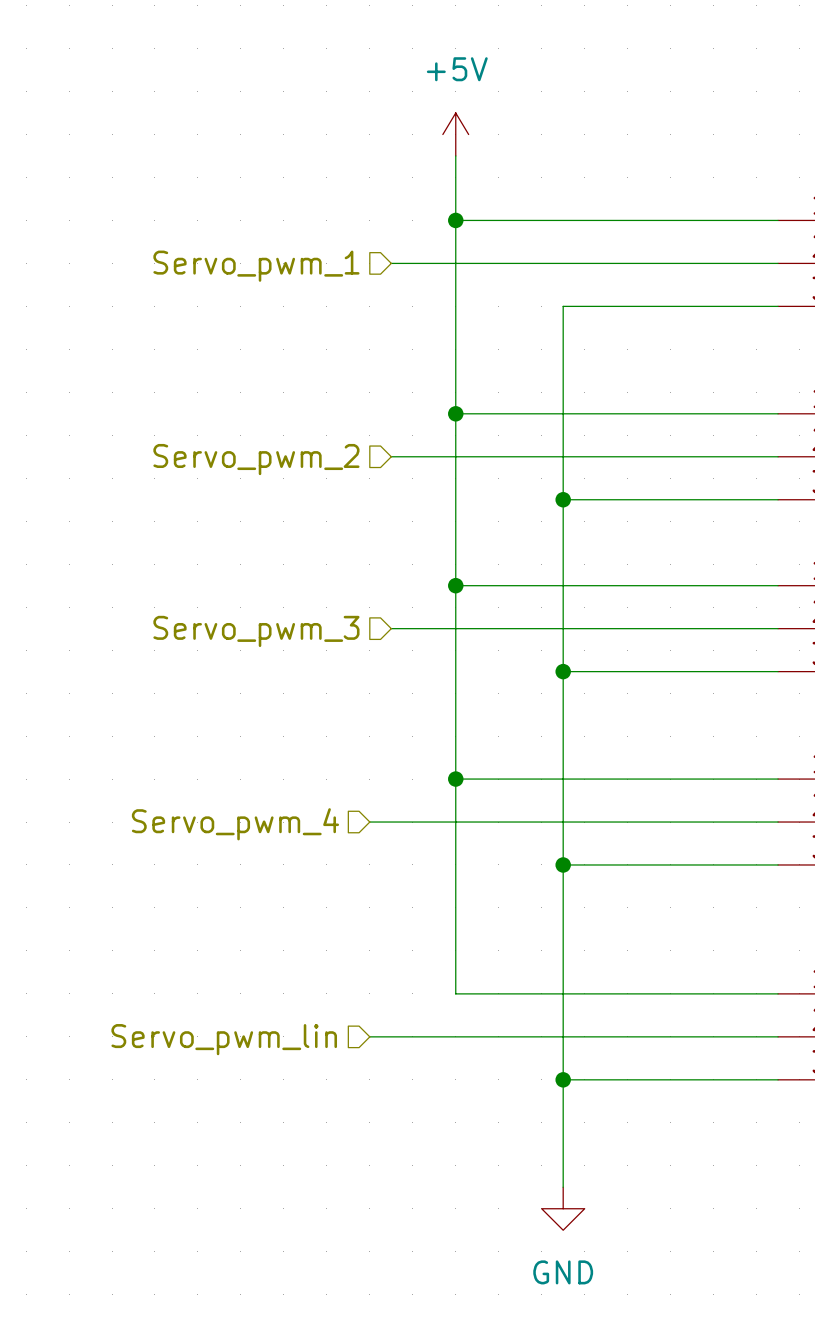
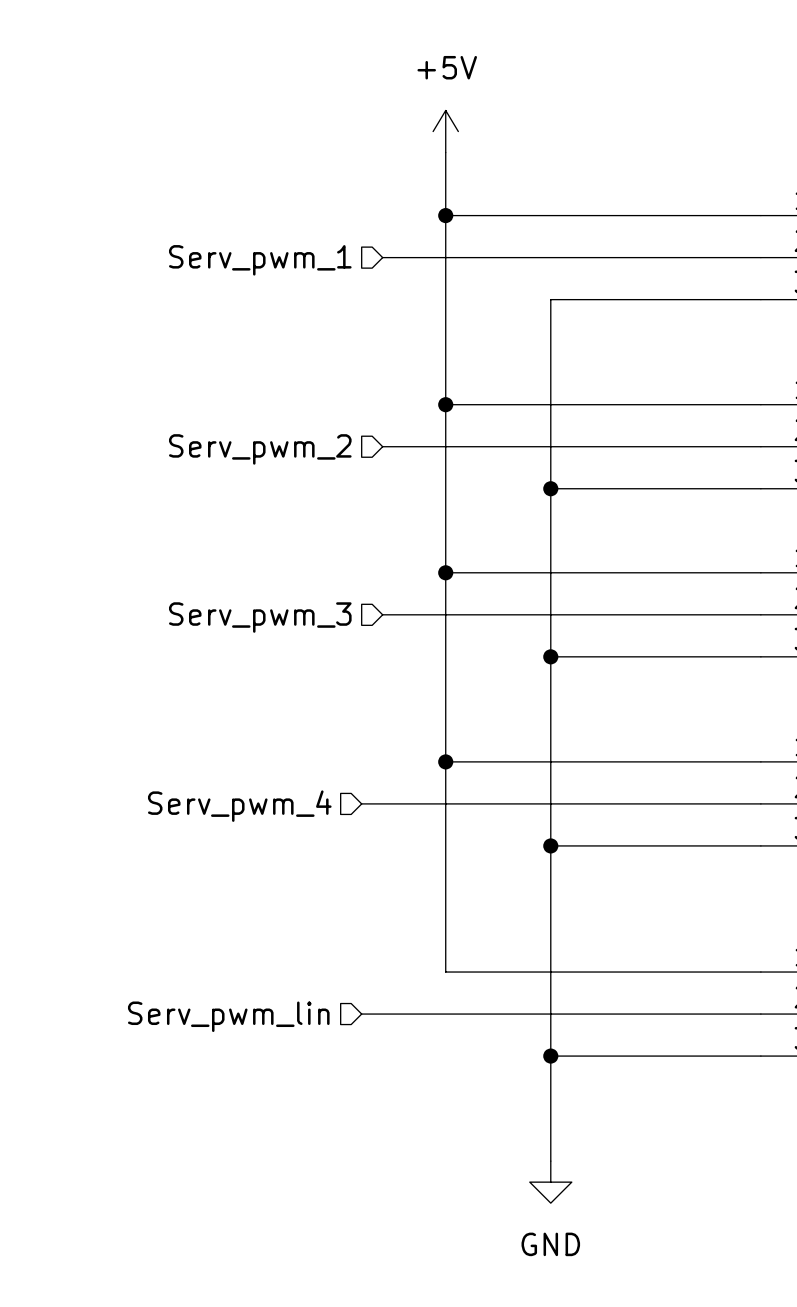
hierarchical label: Servo_pwm_1 (256, 266) -> Serv_pwm_1 (260, 260)
hierarchical label: Servo_pwm_2 (256, 459) -> Serv_pwm_2 (260, 449)
hierarchical label: Servo_pwm_3 (256, 631) -> Serv_pwm_3 (260, 617)
hierarchical label: Servo_pwm_4 (235, 824) -> Serv_pwm_4 (239, 806)
hierarchical label: Servo_pwm_lin (224, 1039) -> Serv_pwm_lin (228, 1016)

